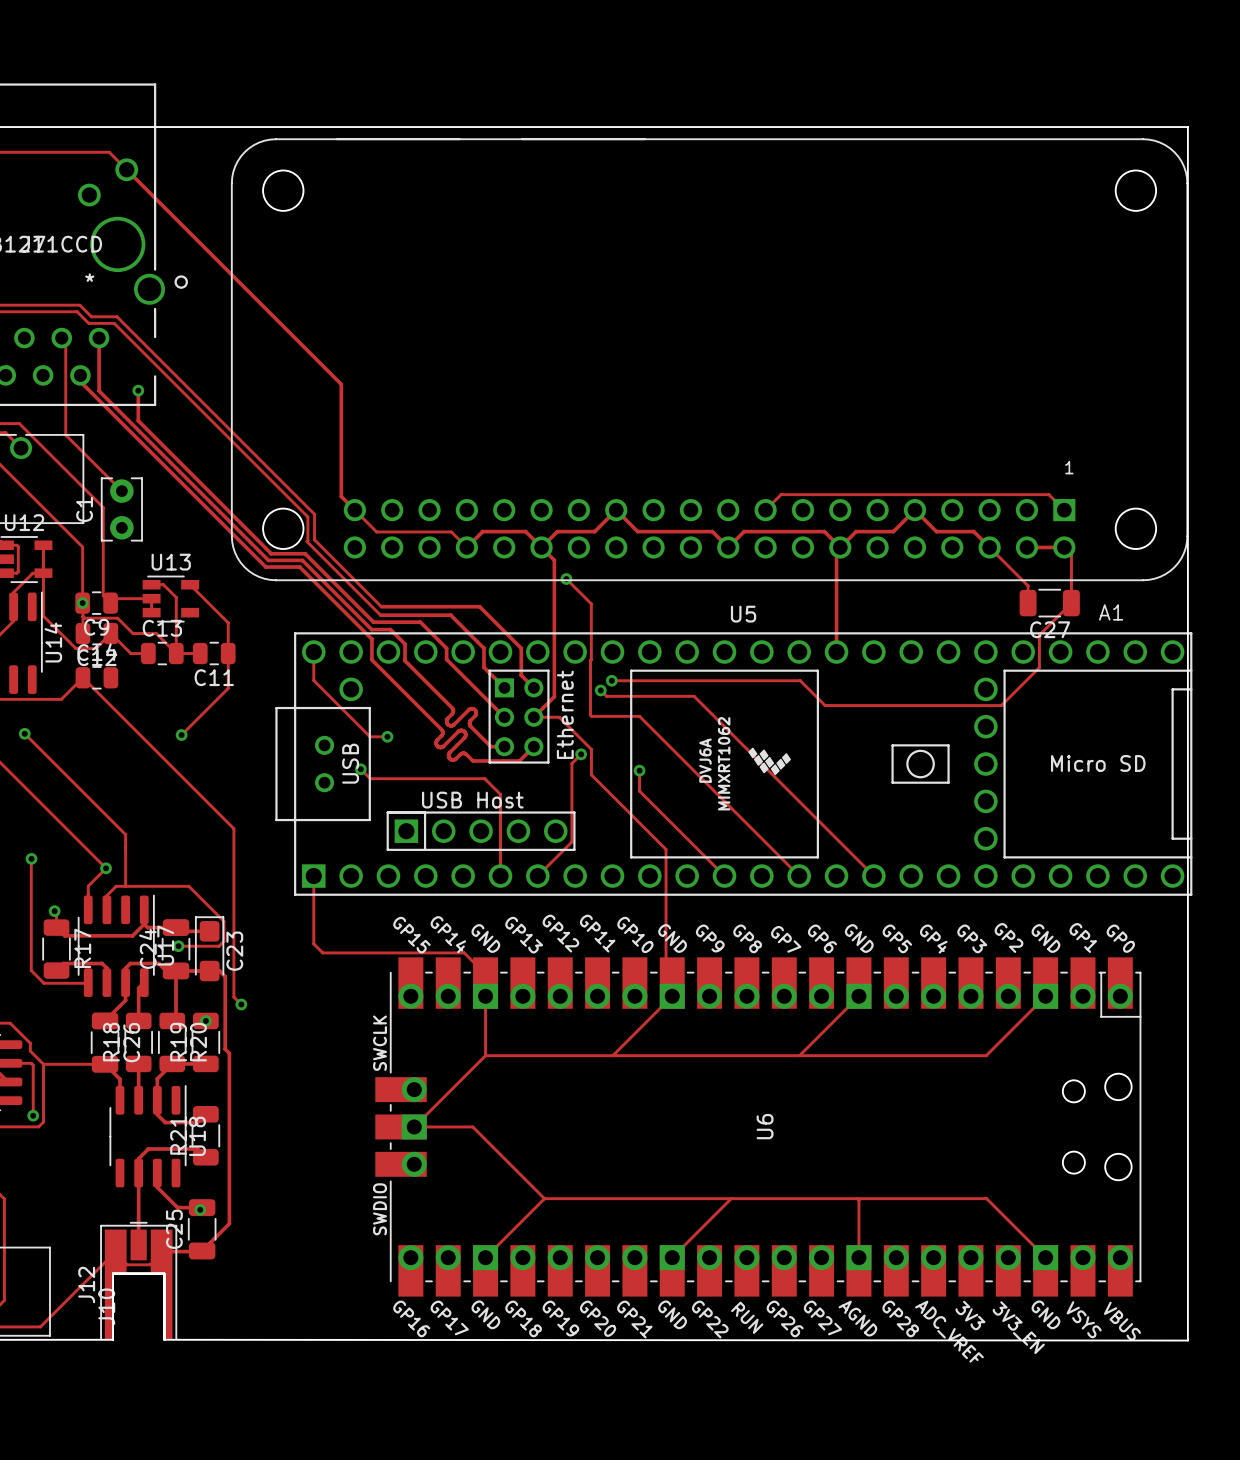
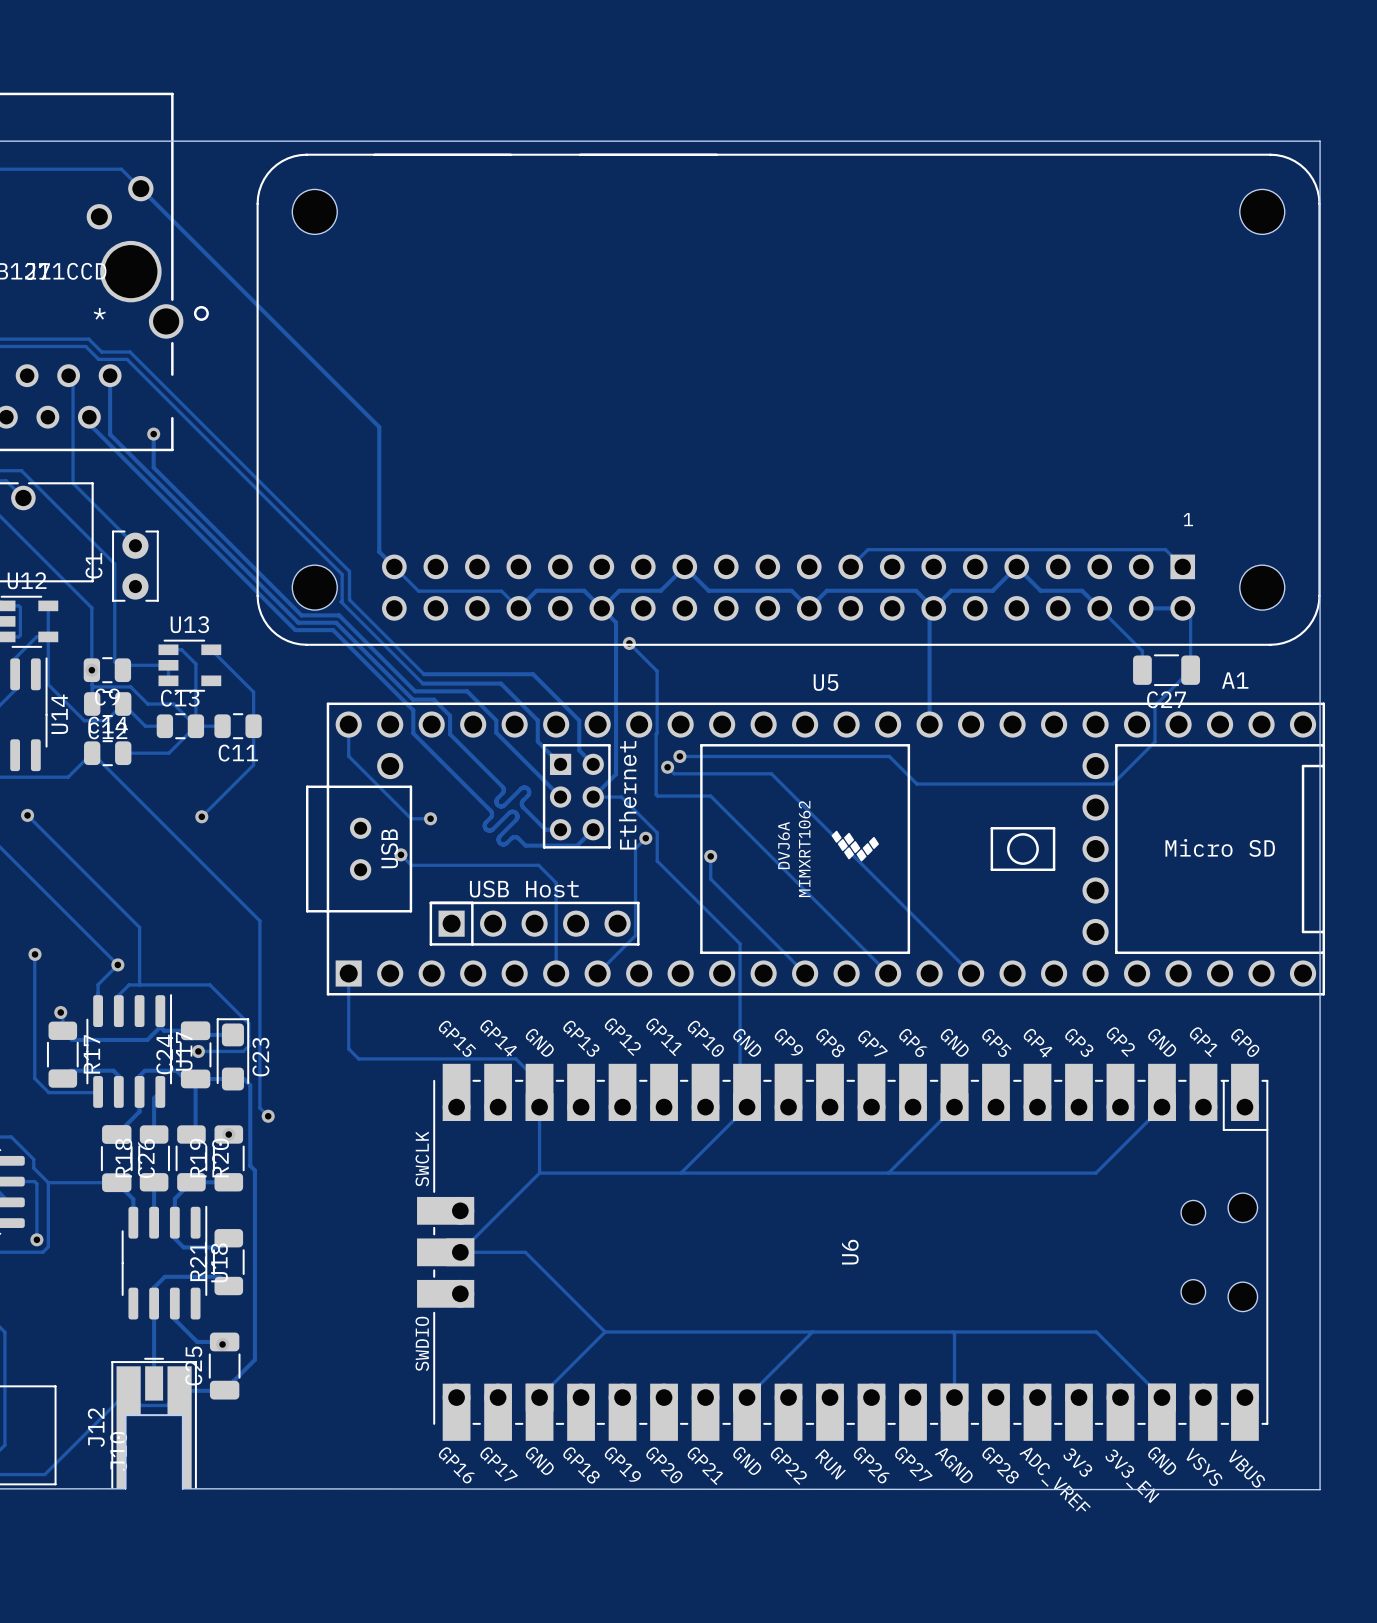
track: none -> (195, 726) (168, 753) (123, 753)

